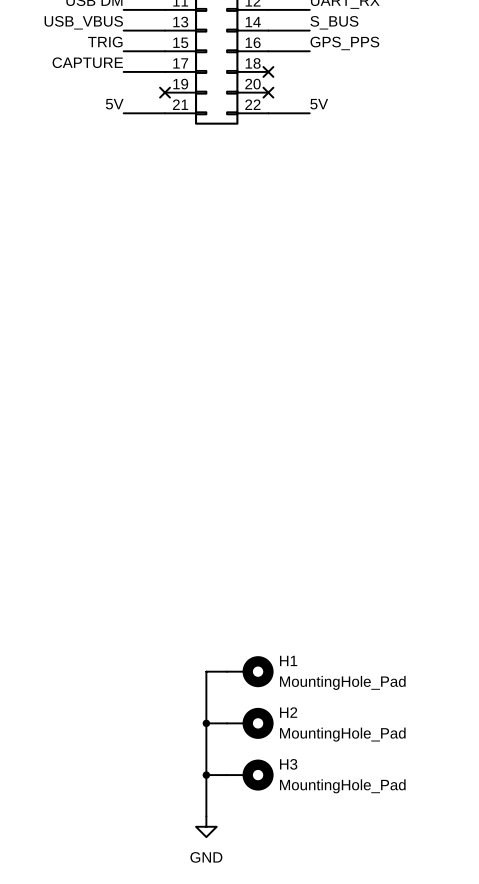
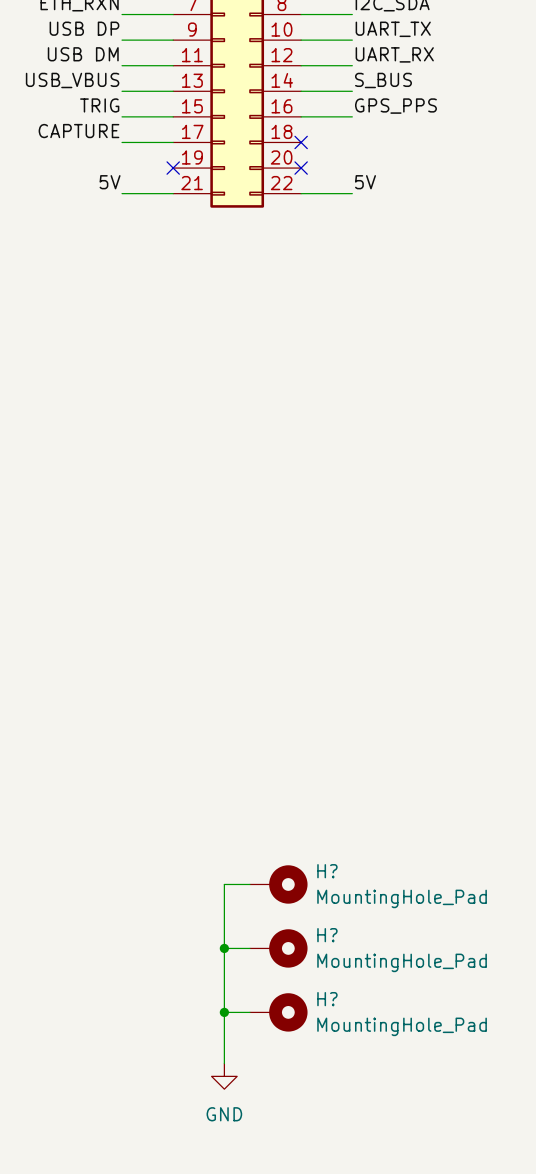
H1 name: H1 (288, 660) -> H? (327, 871)
H2 name: H2 (288, 712) -> H? (327, 935)
H3 name: H3 (288, 764) -> H? (327, 999)

